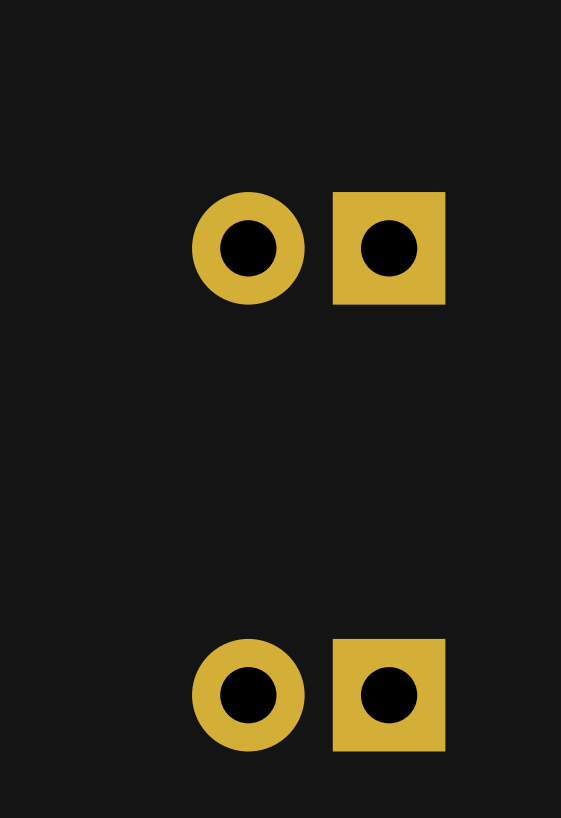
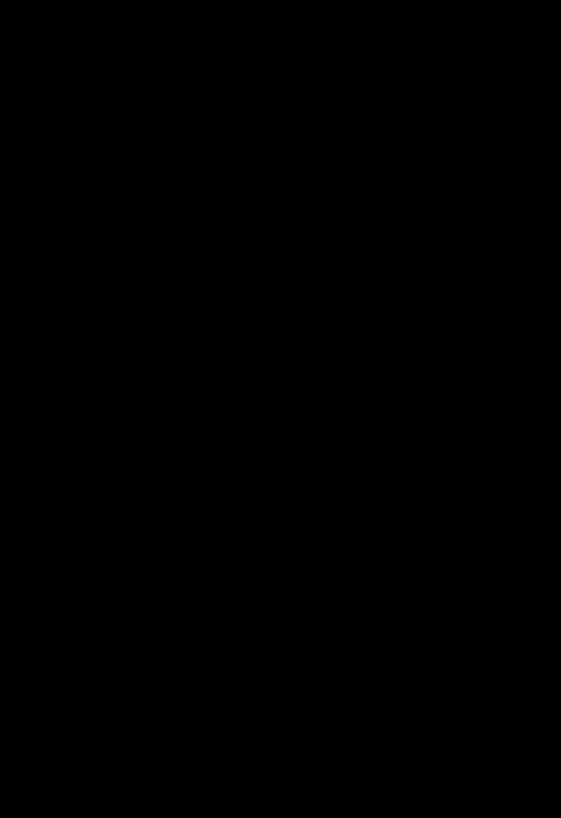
part: (318, 248) -> none
part: (318, 695) -> none

